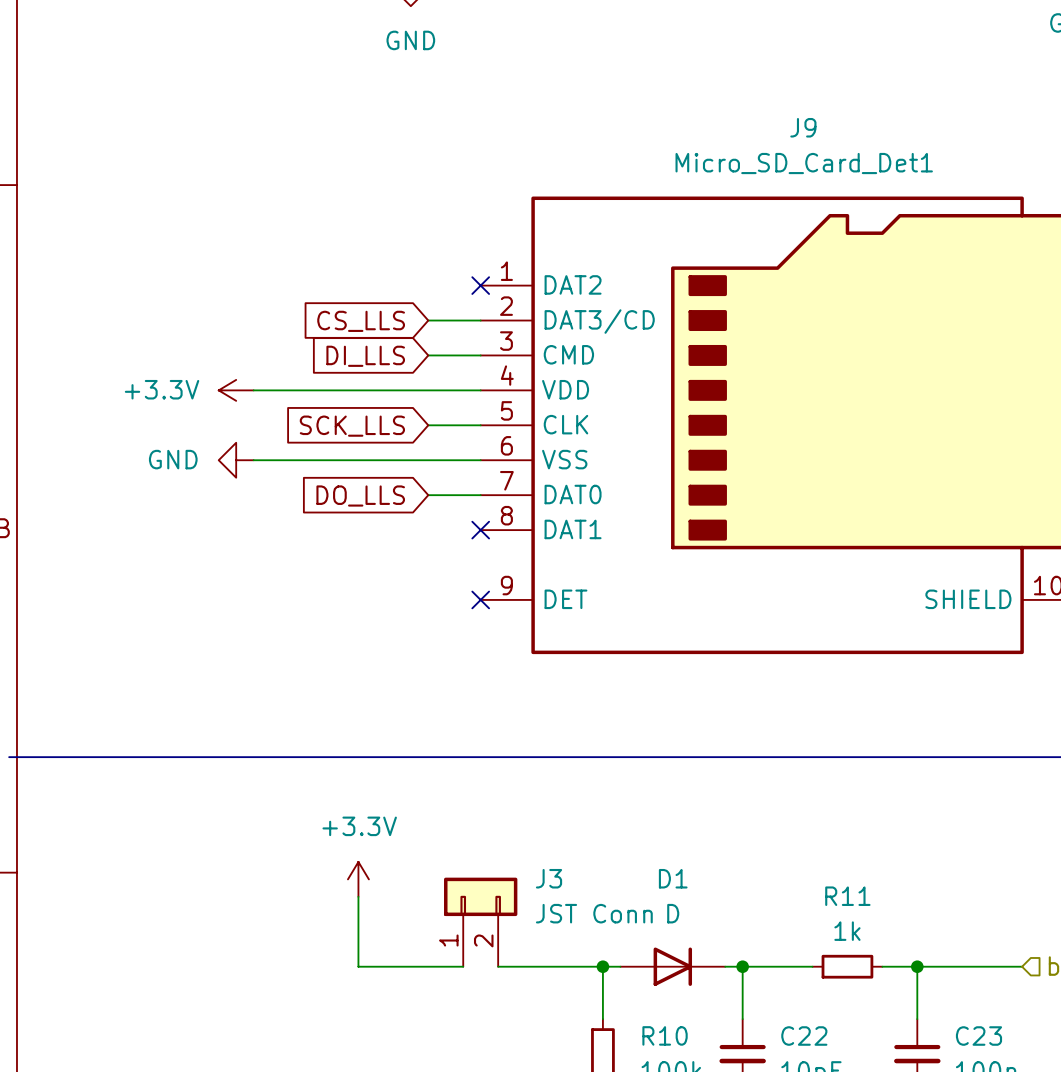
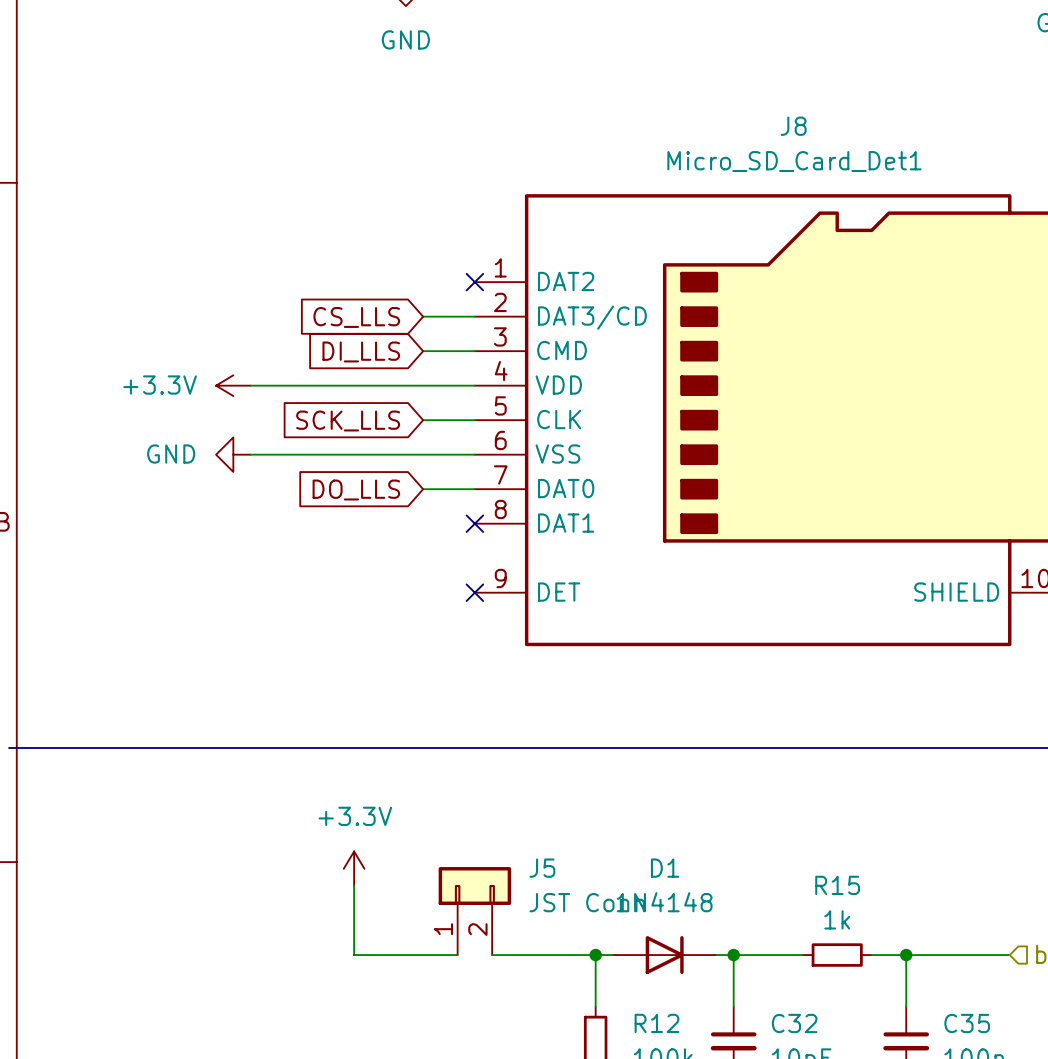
J9 name: J9 (803, 127) -> J8 (793, 126)
J3 name: J3 (549, 878) -> J5 (542, 868)
R11 name: R11 (847, 896) -> R15 (837, 885)
D1 value: D (673, 913) -> 1N4148 (664, 902)
R10 name: R10 (665, 1035) -> R12 (657, 1023)
C22 name: C22 (804, 1036) -> C32 (794, 1023)
C23 name: C23 (978, 1036) -> C35 (967, 1023)

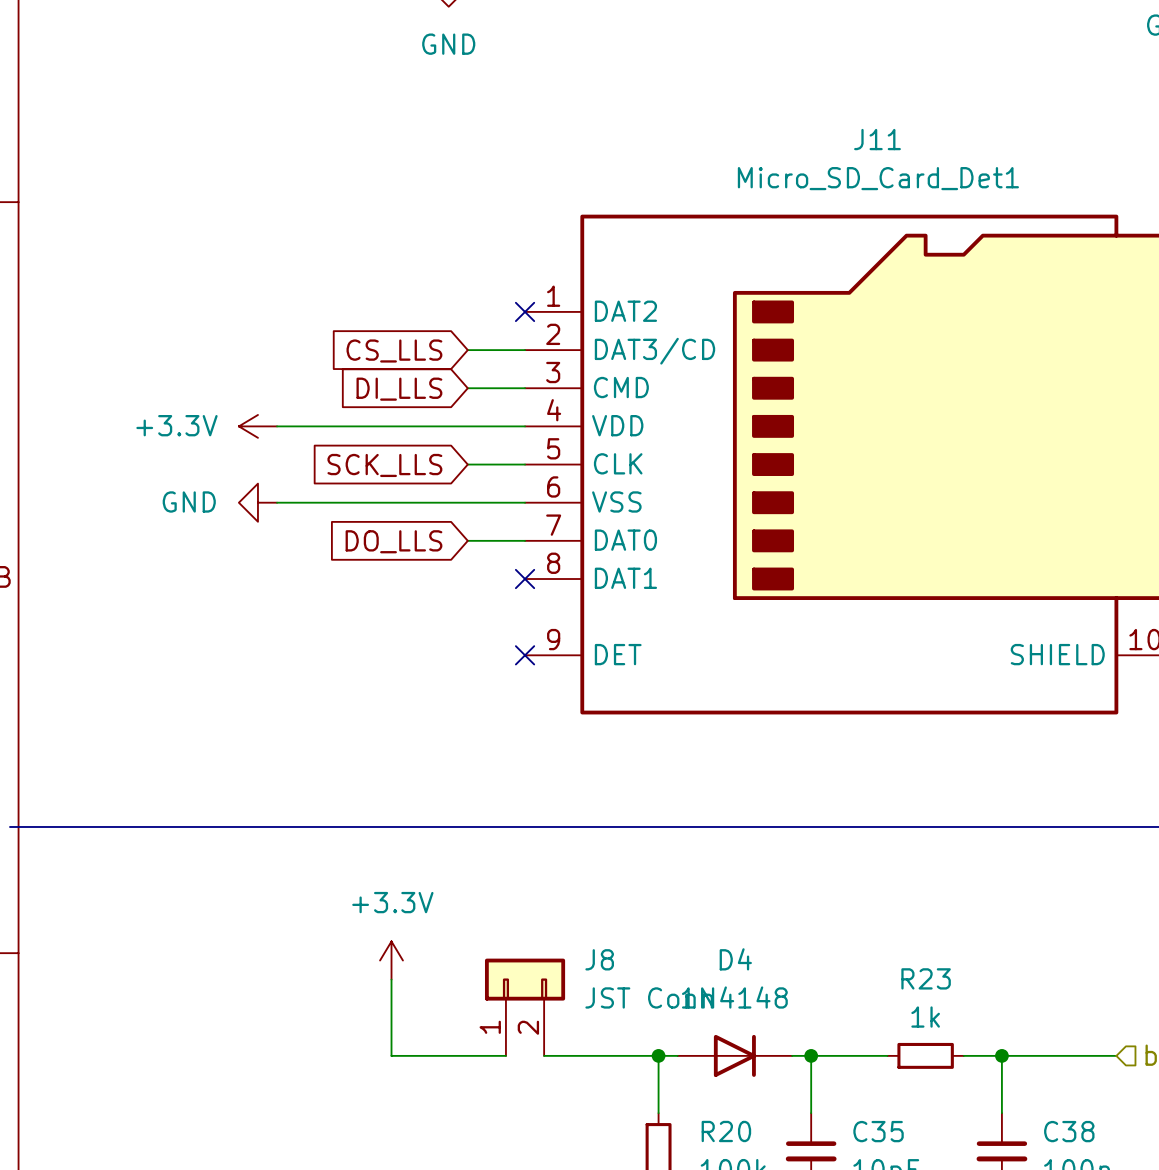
J8 name: J8 (793, 126) -> J11 (877, 139)
J5 name: J5 (542, 868) -> J8 (599, 959)
D1 name: D1 (665, 868) -> D4 (735, 959)
R15 name: R15 (837, 885) -> R23 (926, 978)
R12 name: R12 (657, 1023) -> R20 (726, 1131)
C32 name: C32 (794, 1023) -> C35 (878, 1131)
C35 name: C35 (967, 1023) -> C38 (1069, 1131)

